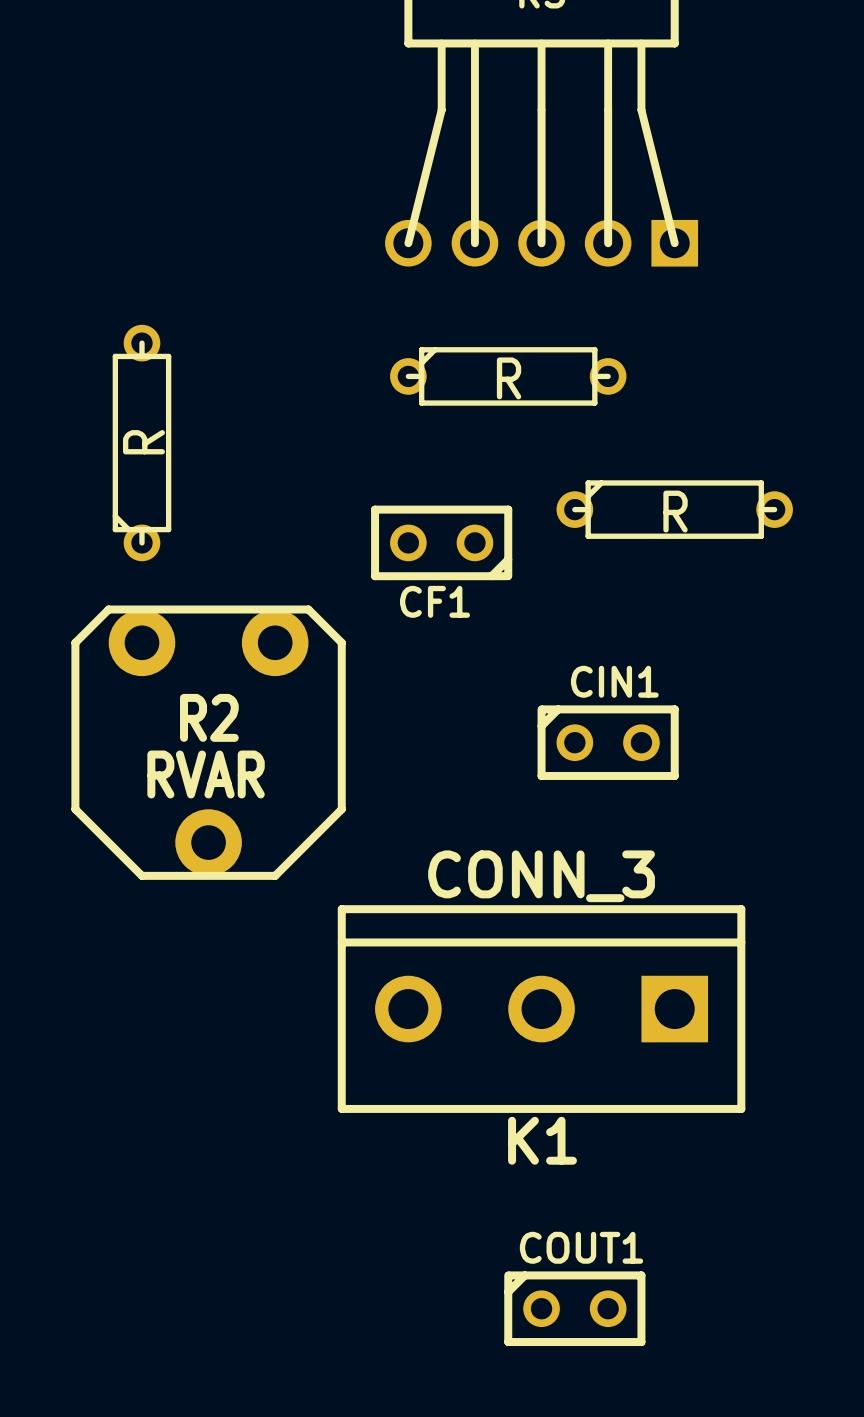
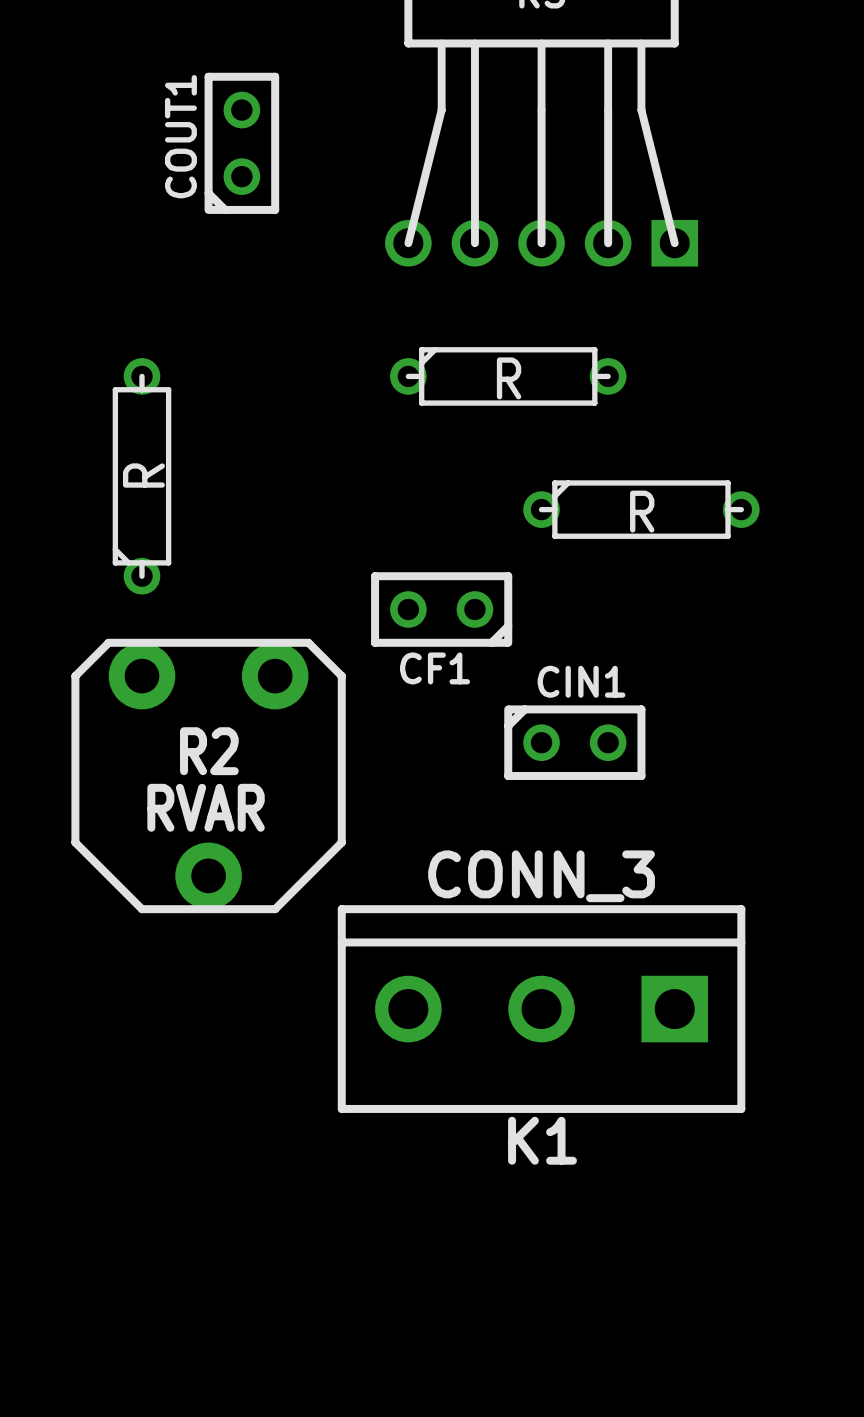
part position: (141, 443) -> (141, 476)
part position: (674, 509) -> (641, 509)
CF1 position: (441, 542) -> (441, 609)
R2 position: (208, 742) -> (208, 775)
CIN1 position: (608, 742) -> (574, 742)
COUT1 rotation: 0° (574, 1308) -> 90° counterclockwise (241, 143)
COUT1 position: (574, 1308) -> (241, 143)

